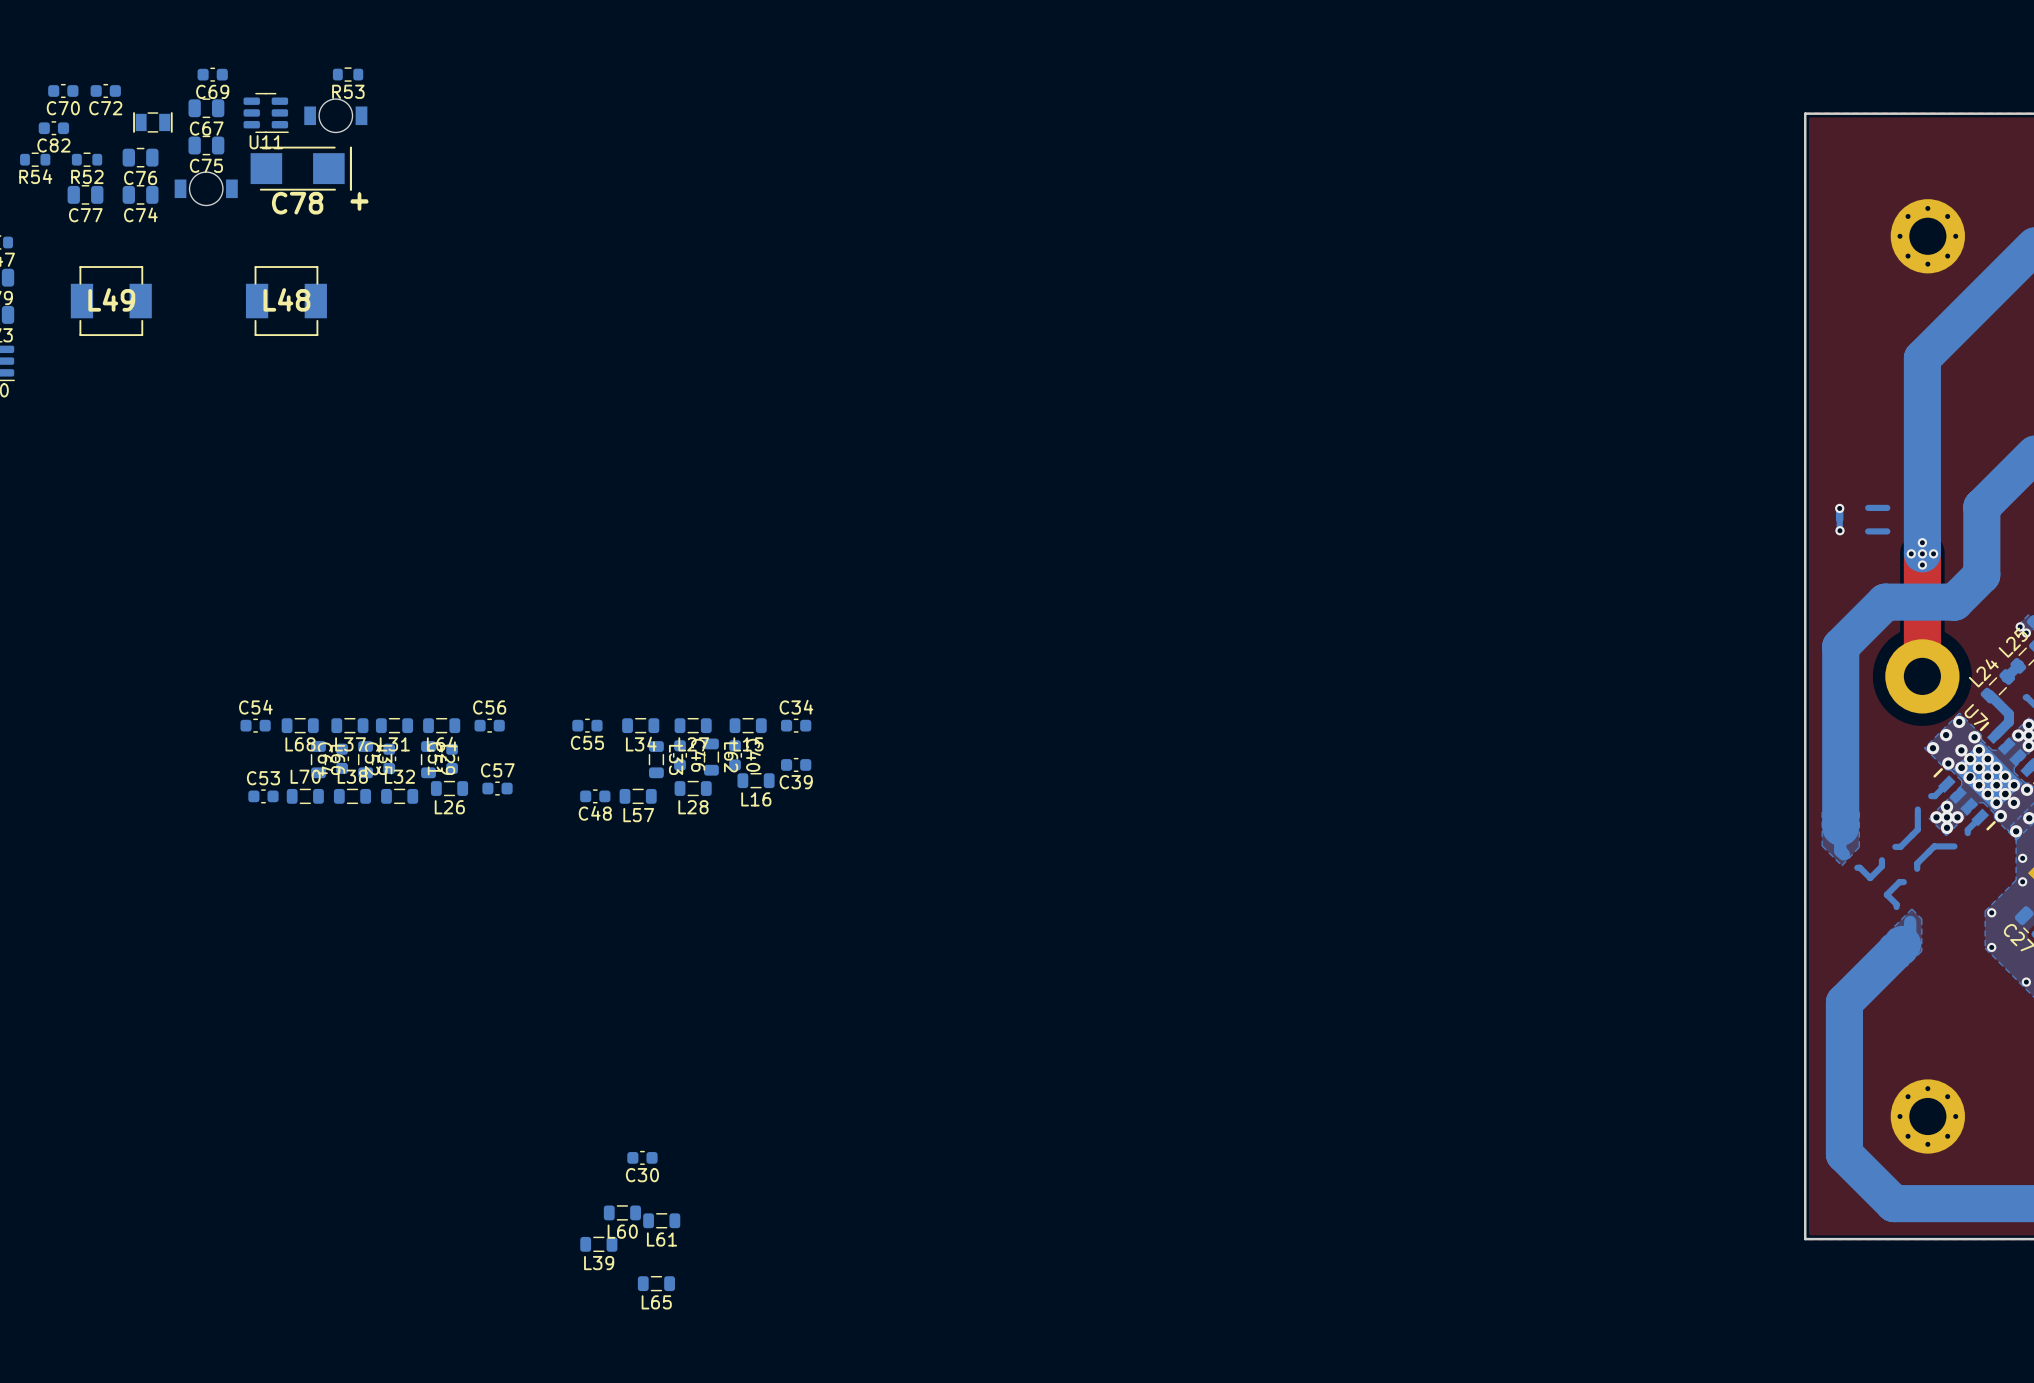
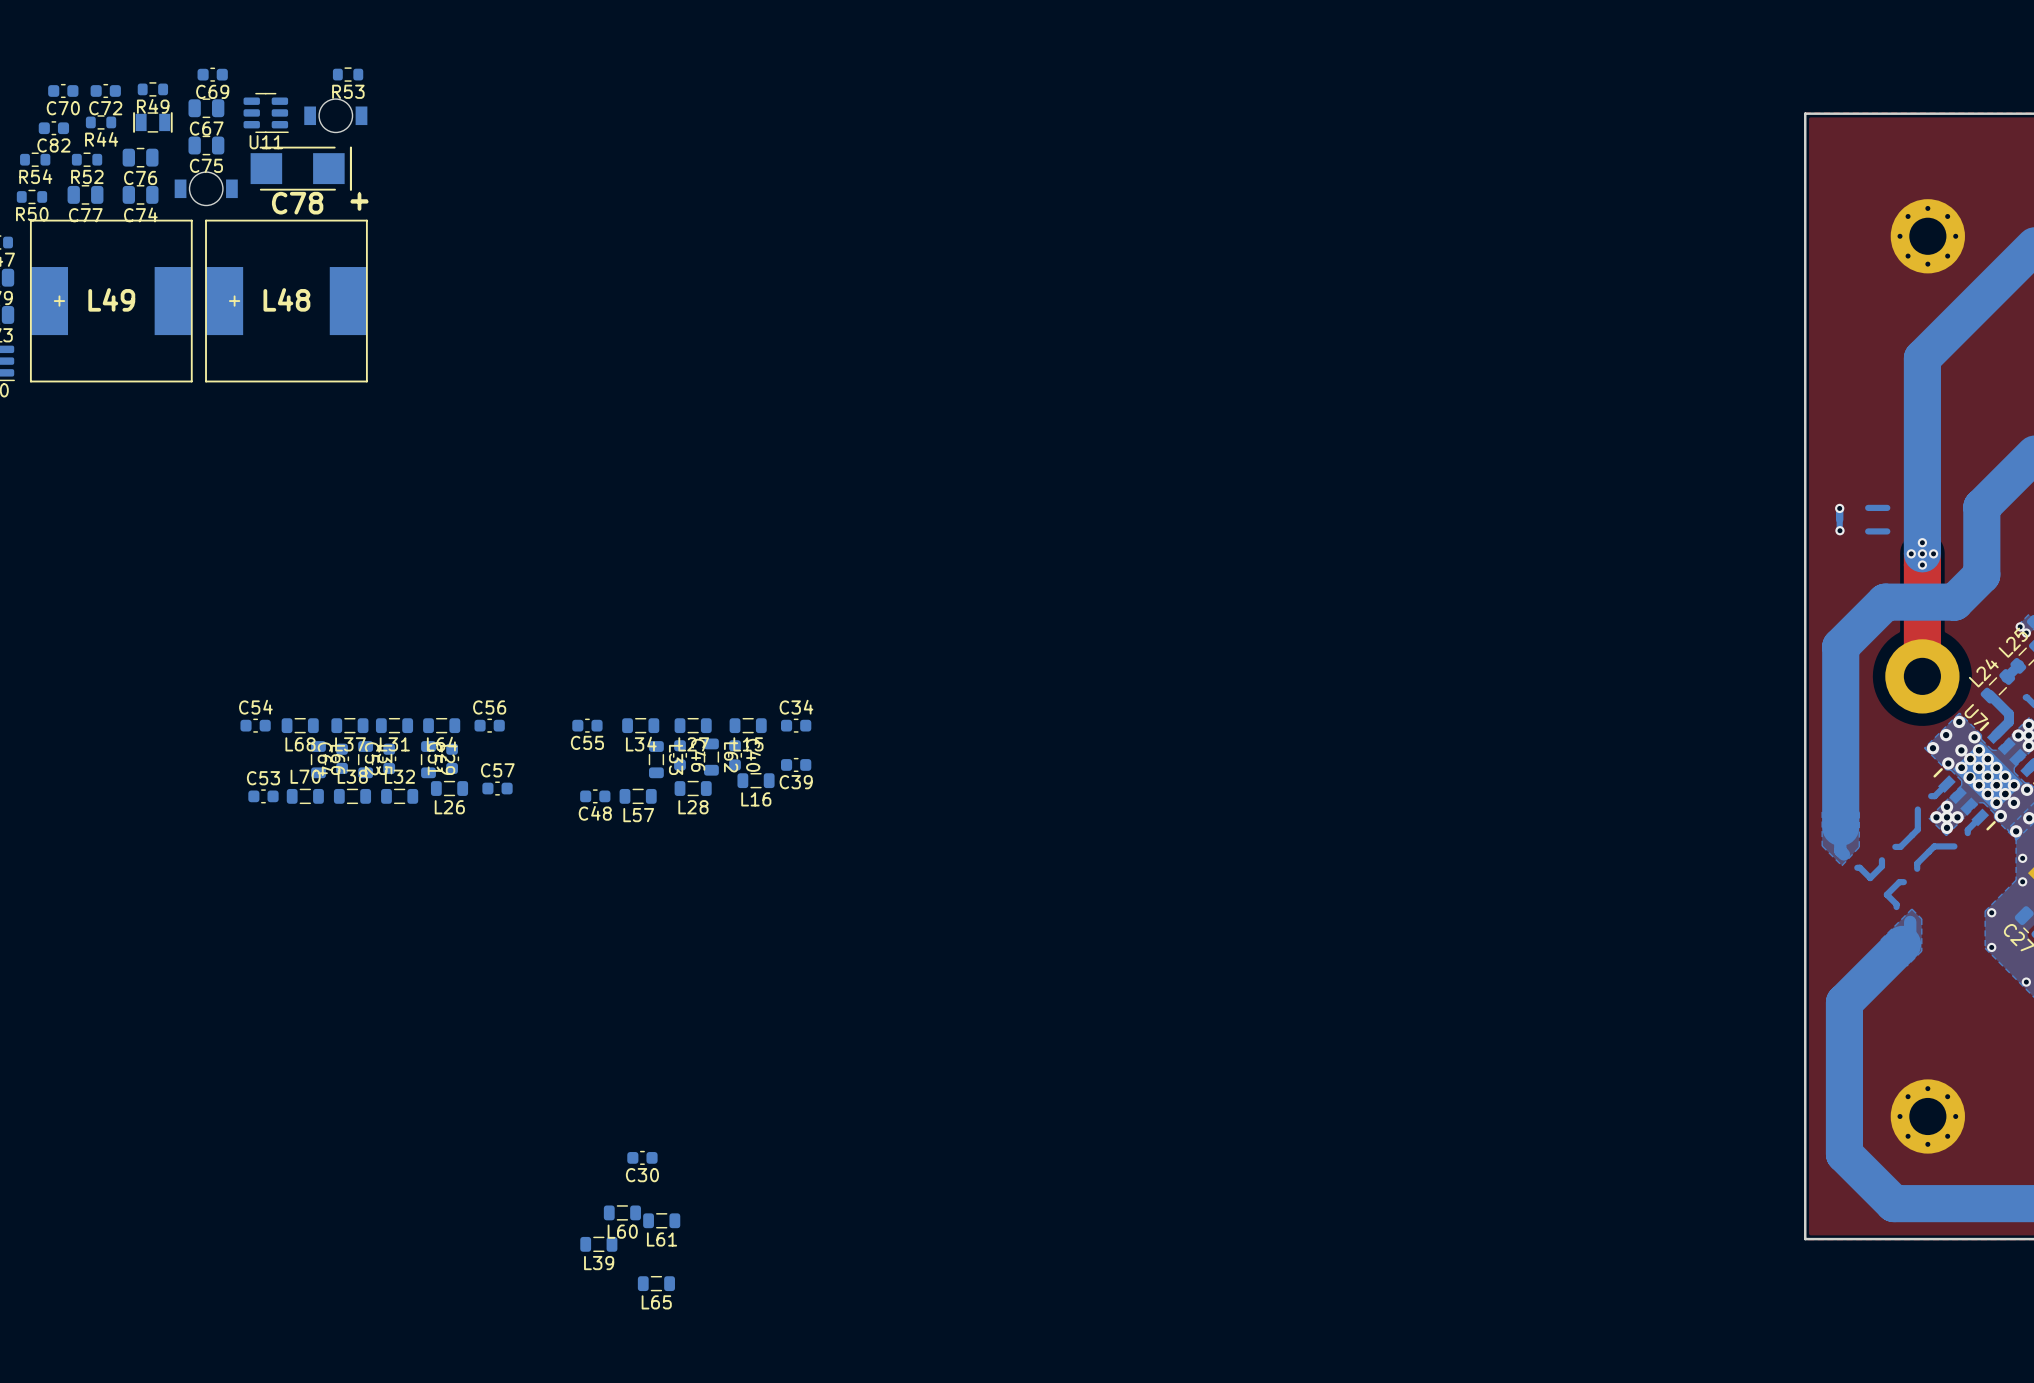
R49: none -> (152, 89)
R44: none -> (101, 122)
R50: none -> (31, 196)
L49 footprint: [70, 266, 152, 337] -> [29, 219, 193, 383]
L48 footprint: [245, 266, 327, 337] -> [205, 219, 368, 383]

